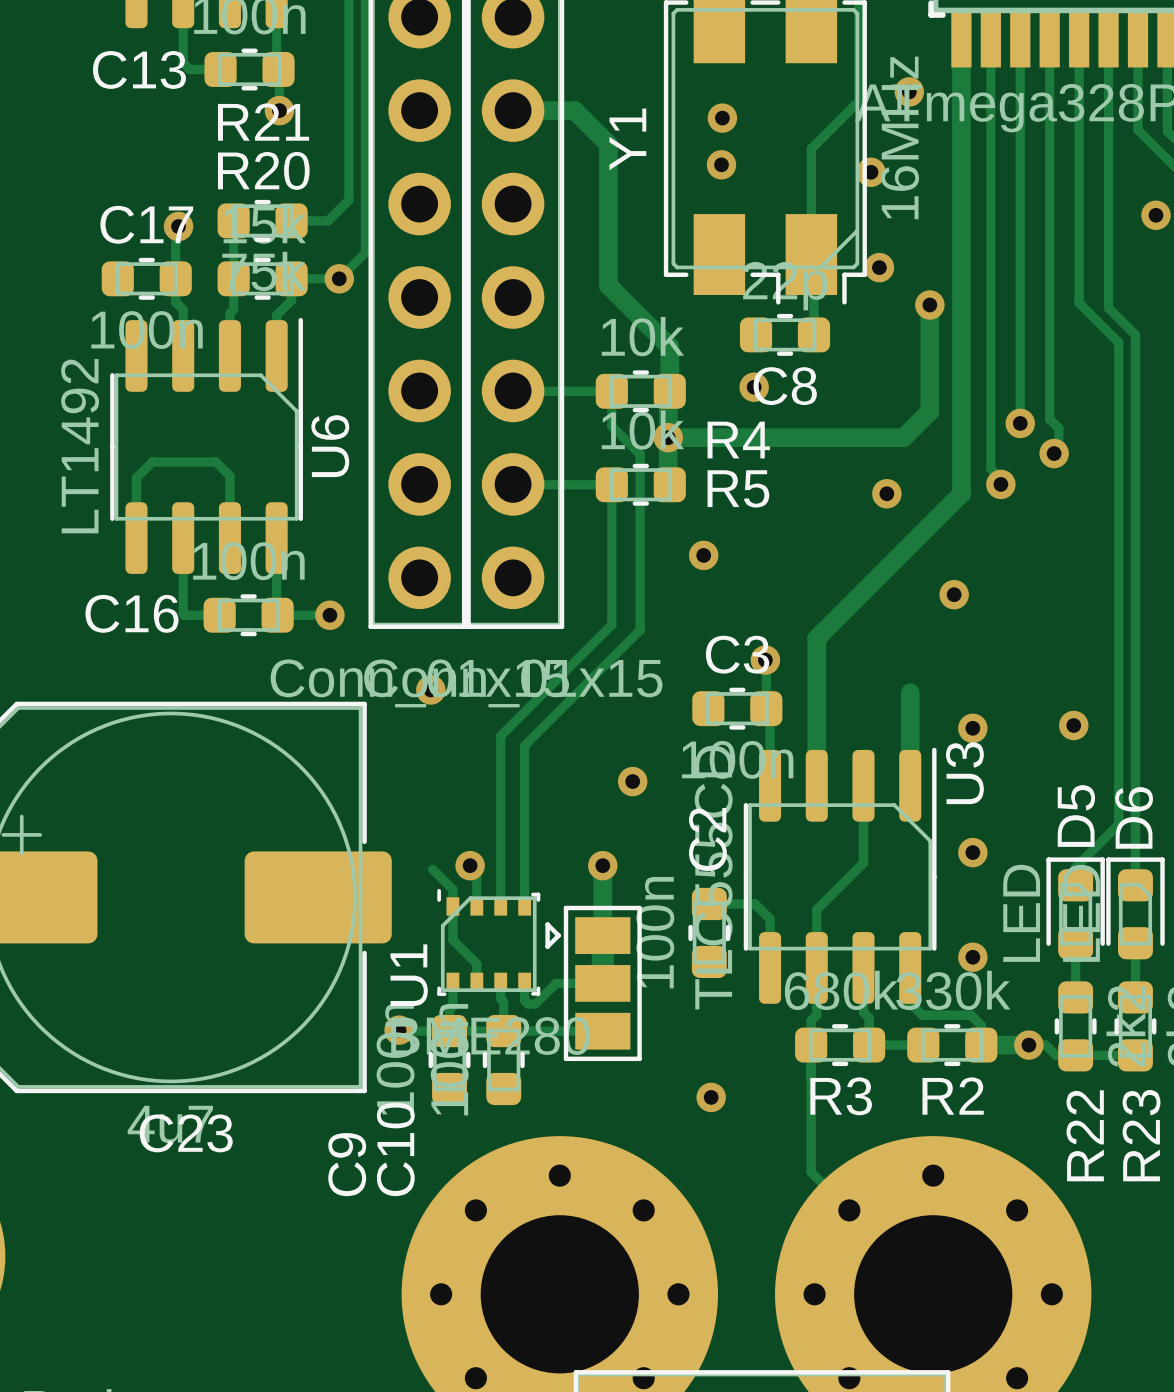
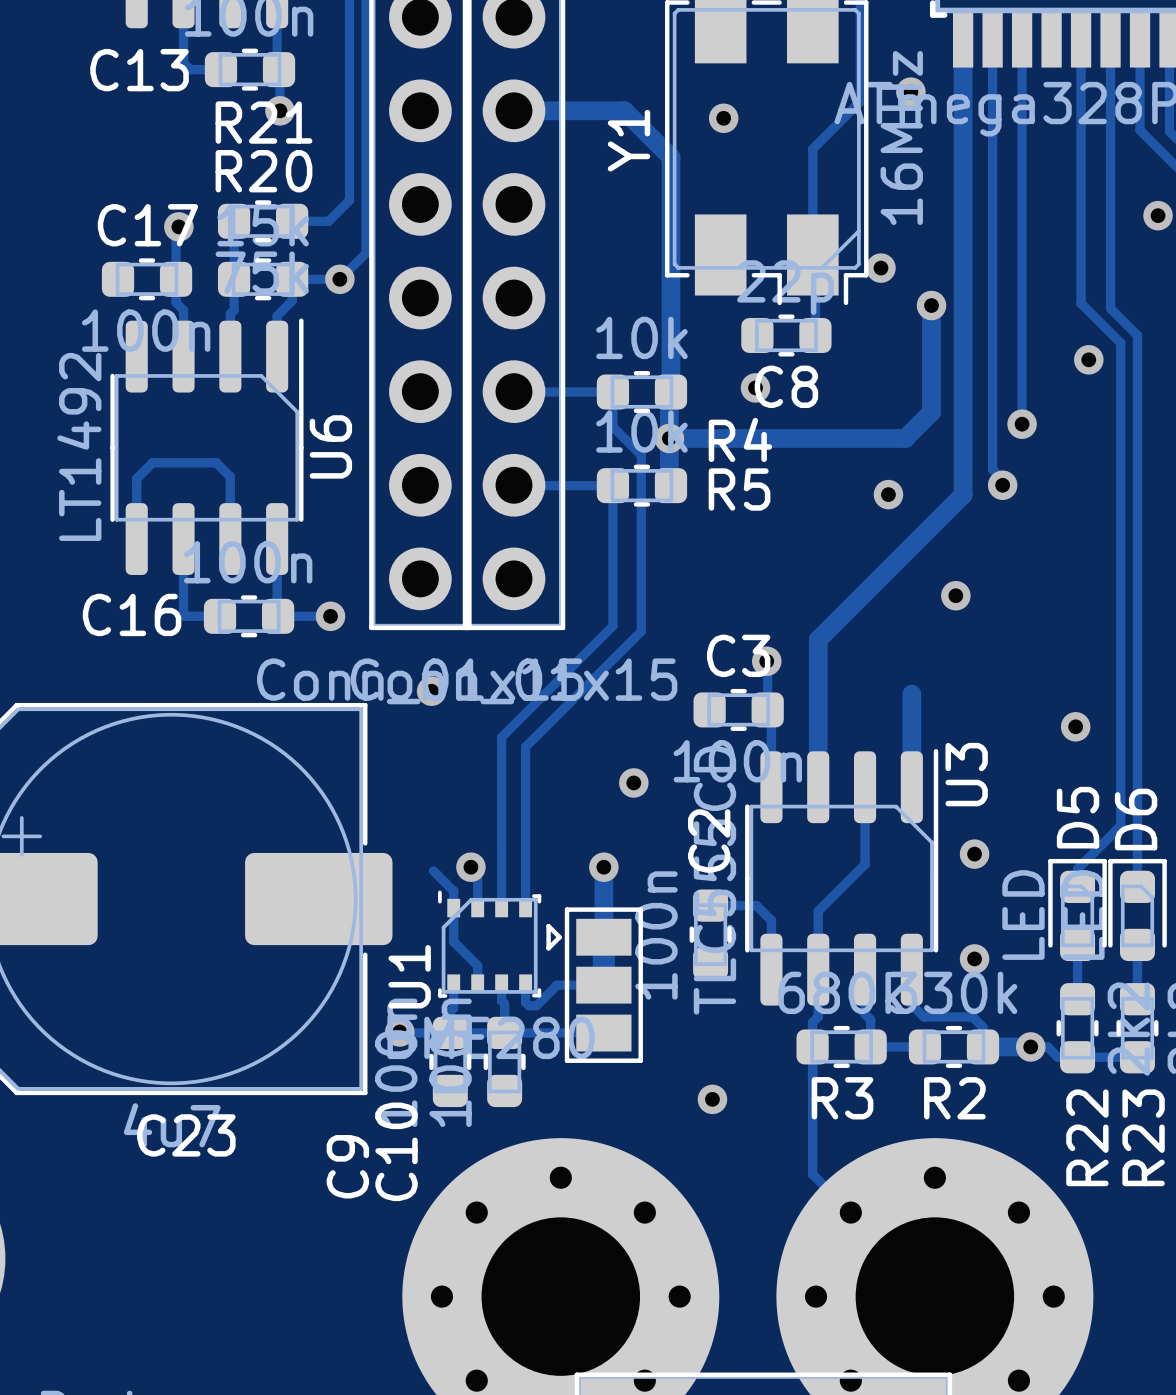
track: (1049, 38) (1049, 419) (1058, 428) (1058, 448) (1054, 453) -> none
track: (574, 110) (608, 144) (608, 285) (669, 346) -> (575, 110) (624, 110) (670, 157) (670, 347)
via: (721, 164) -> none
via: (870, 172) -> none
via: none -> (1088, 359)
via: (1054, 453) -> none
via: (703, 555) -> none
via: (972, 728) -> none

